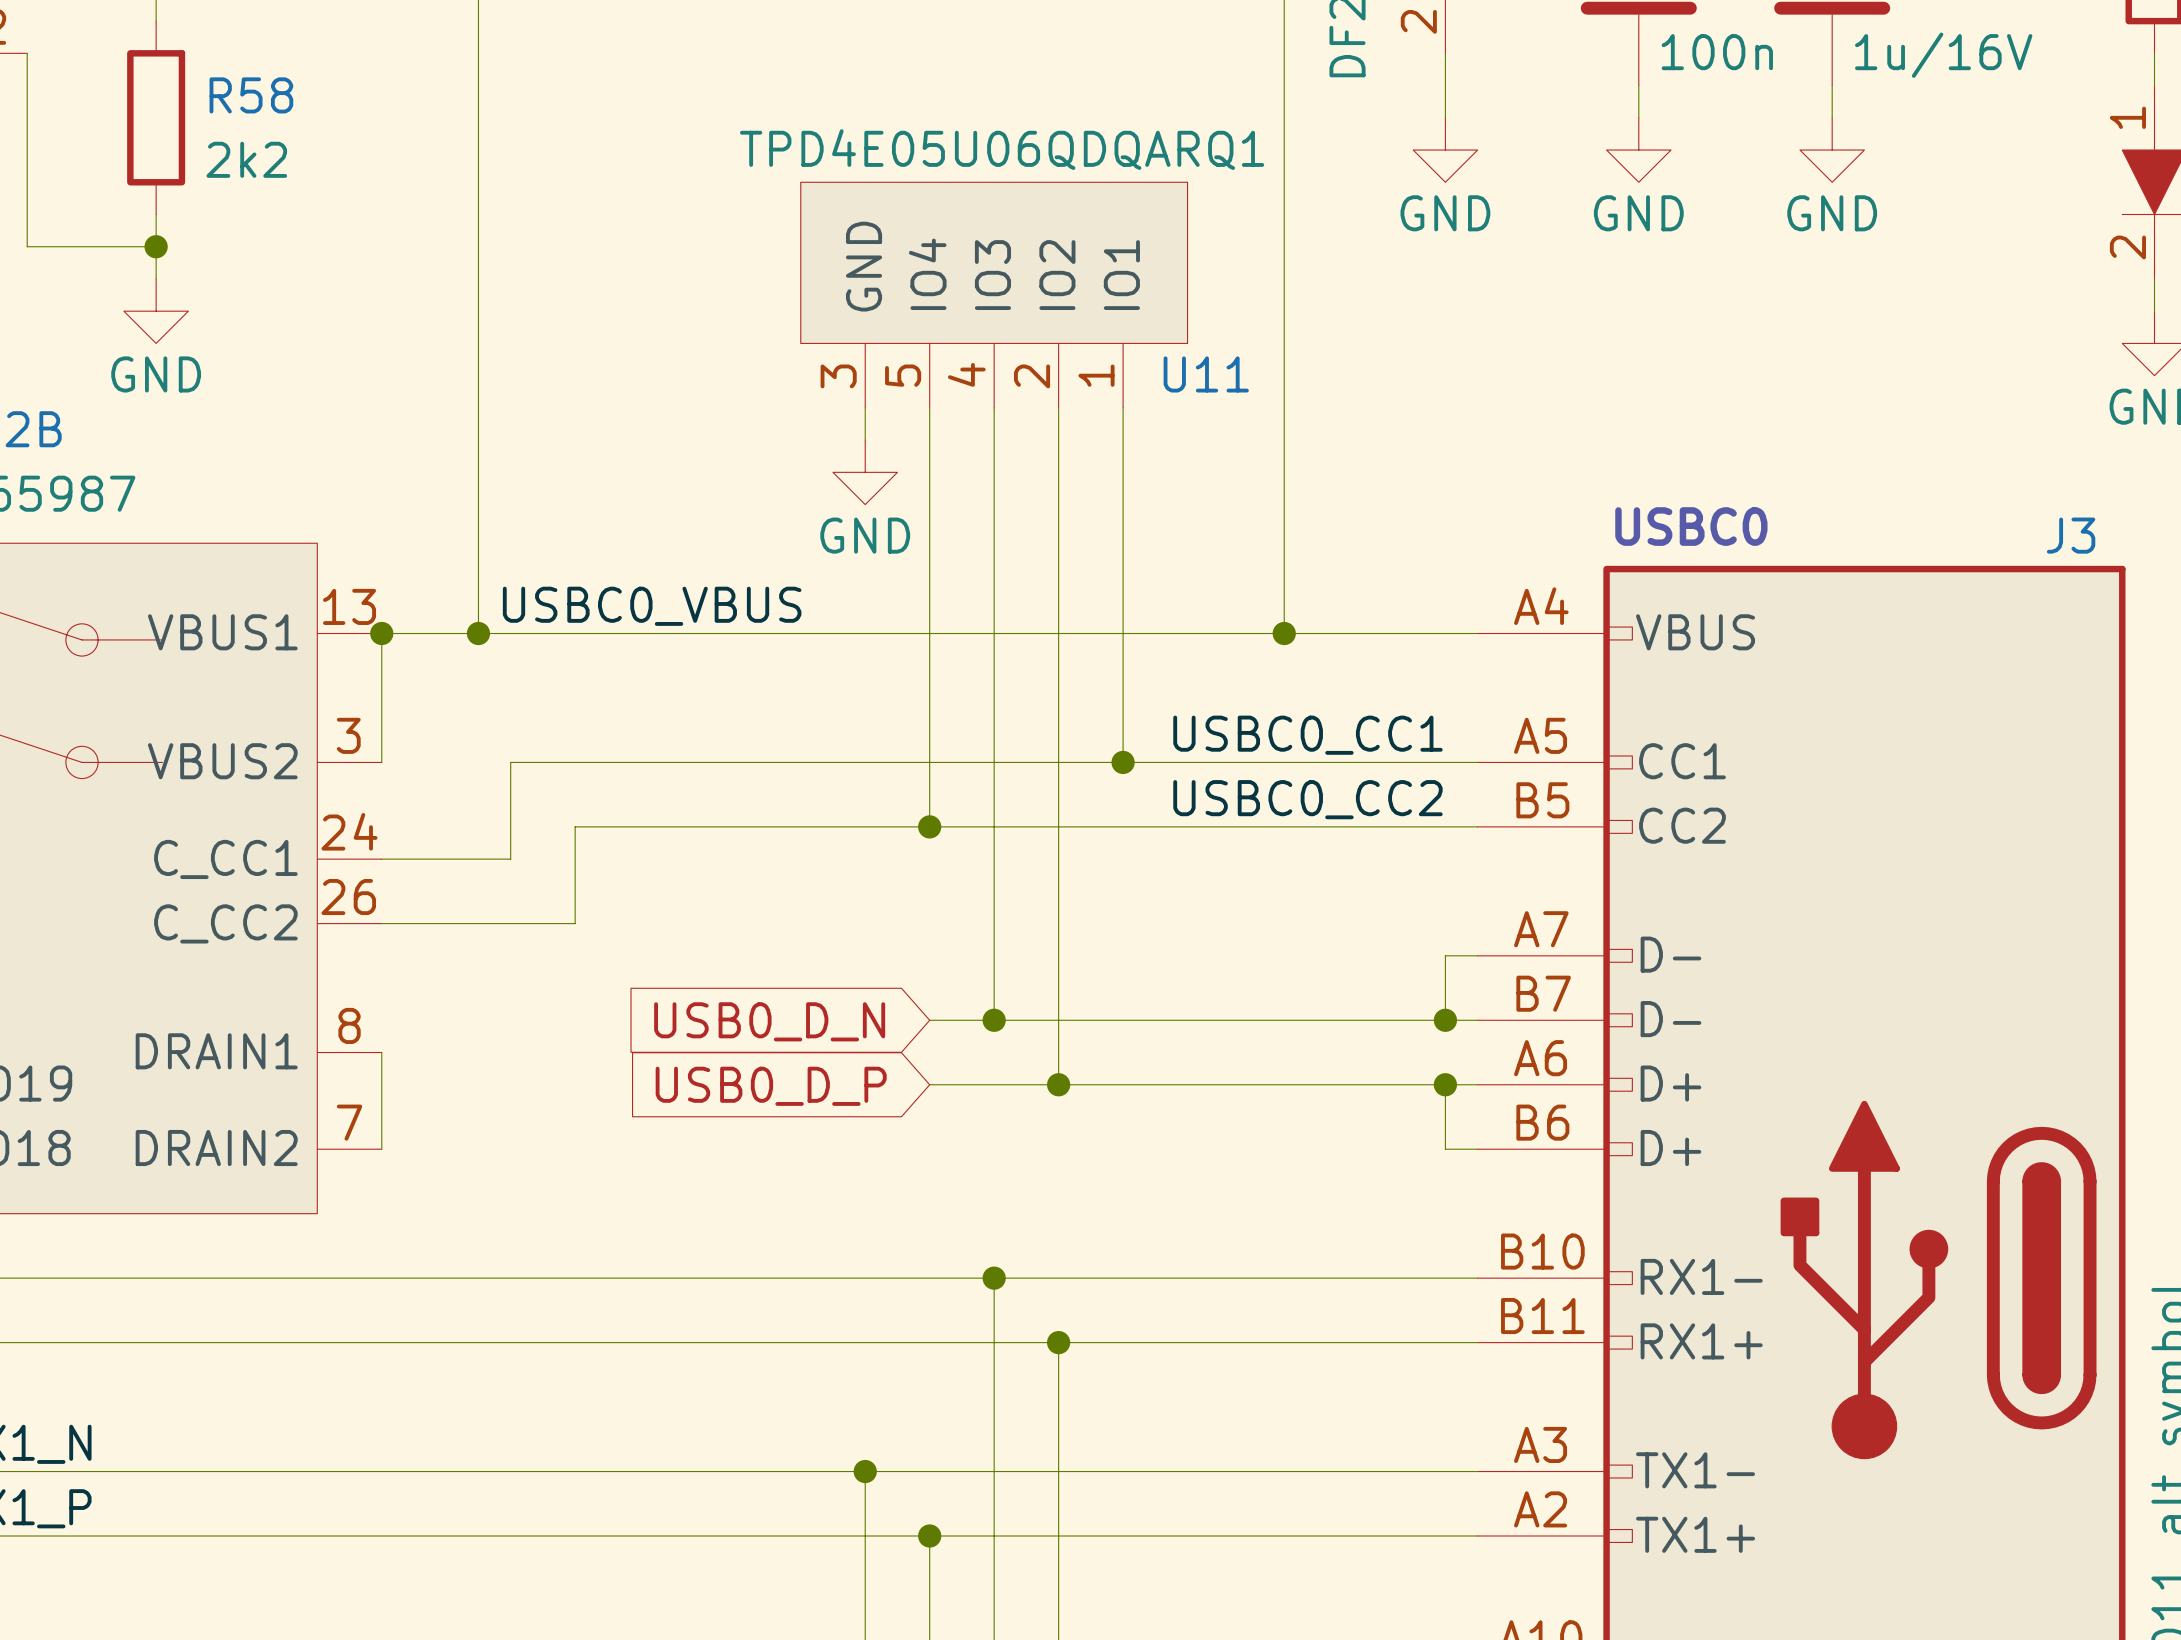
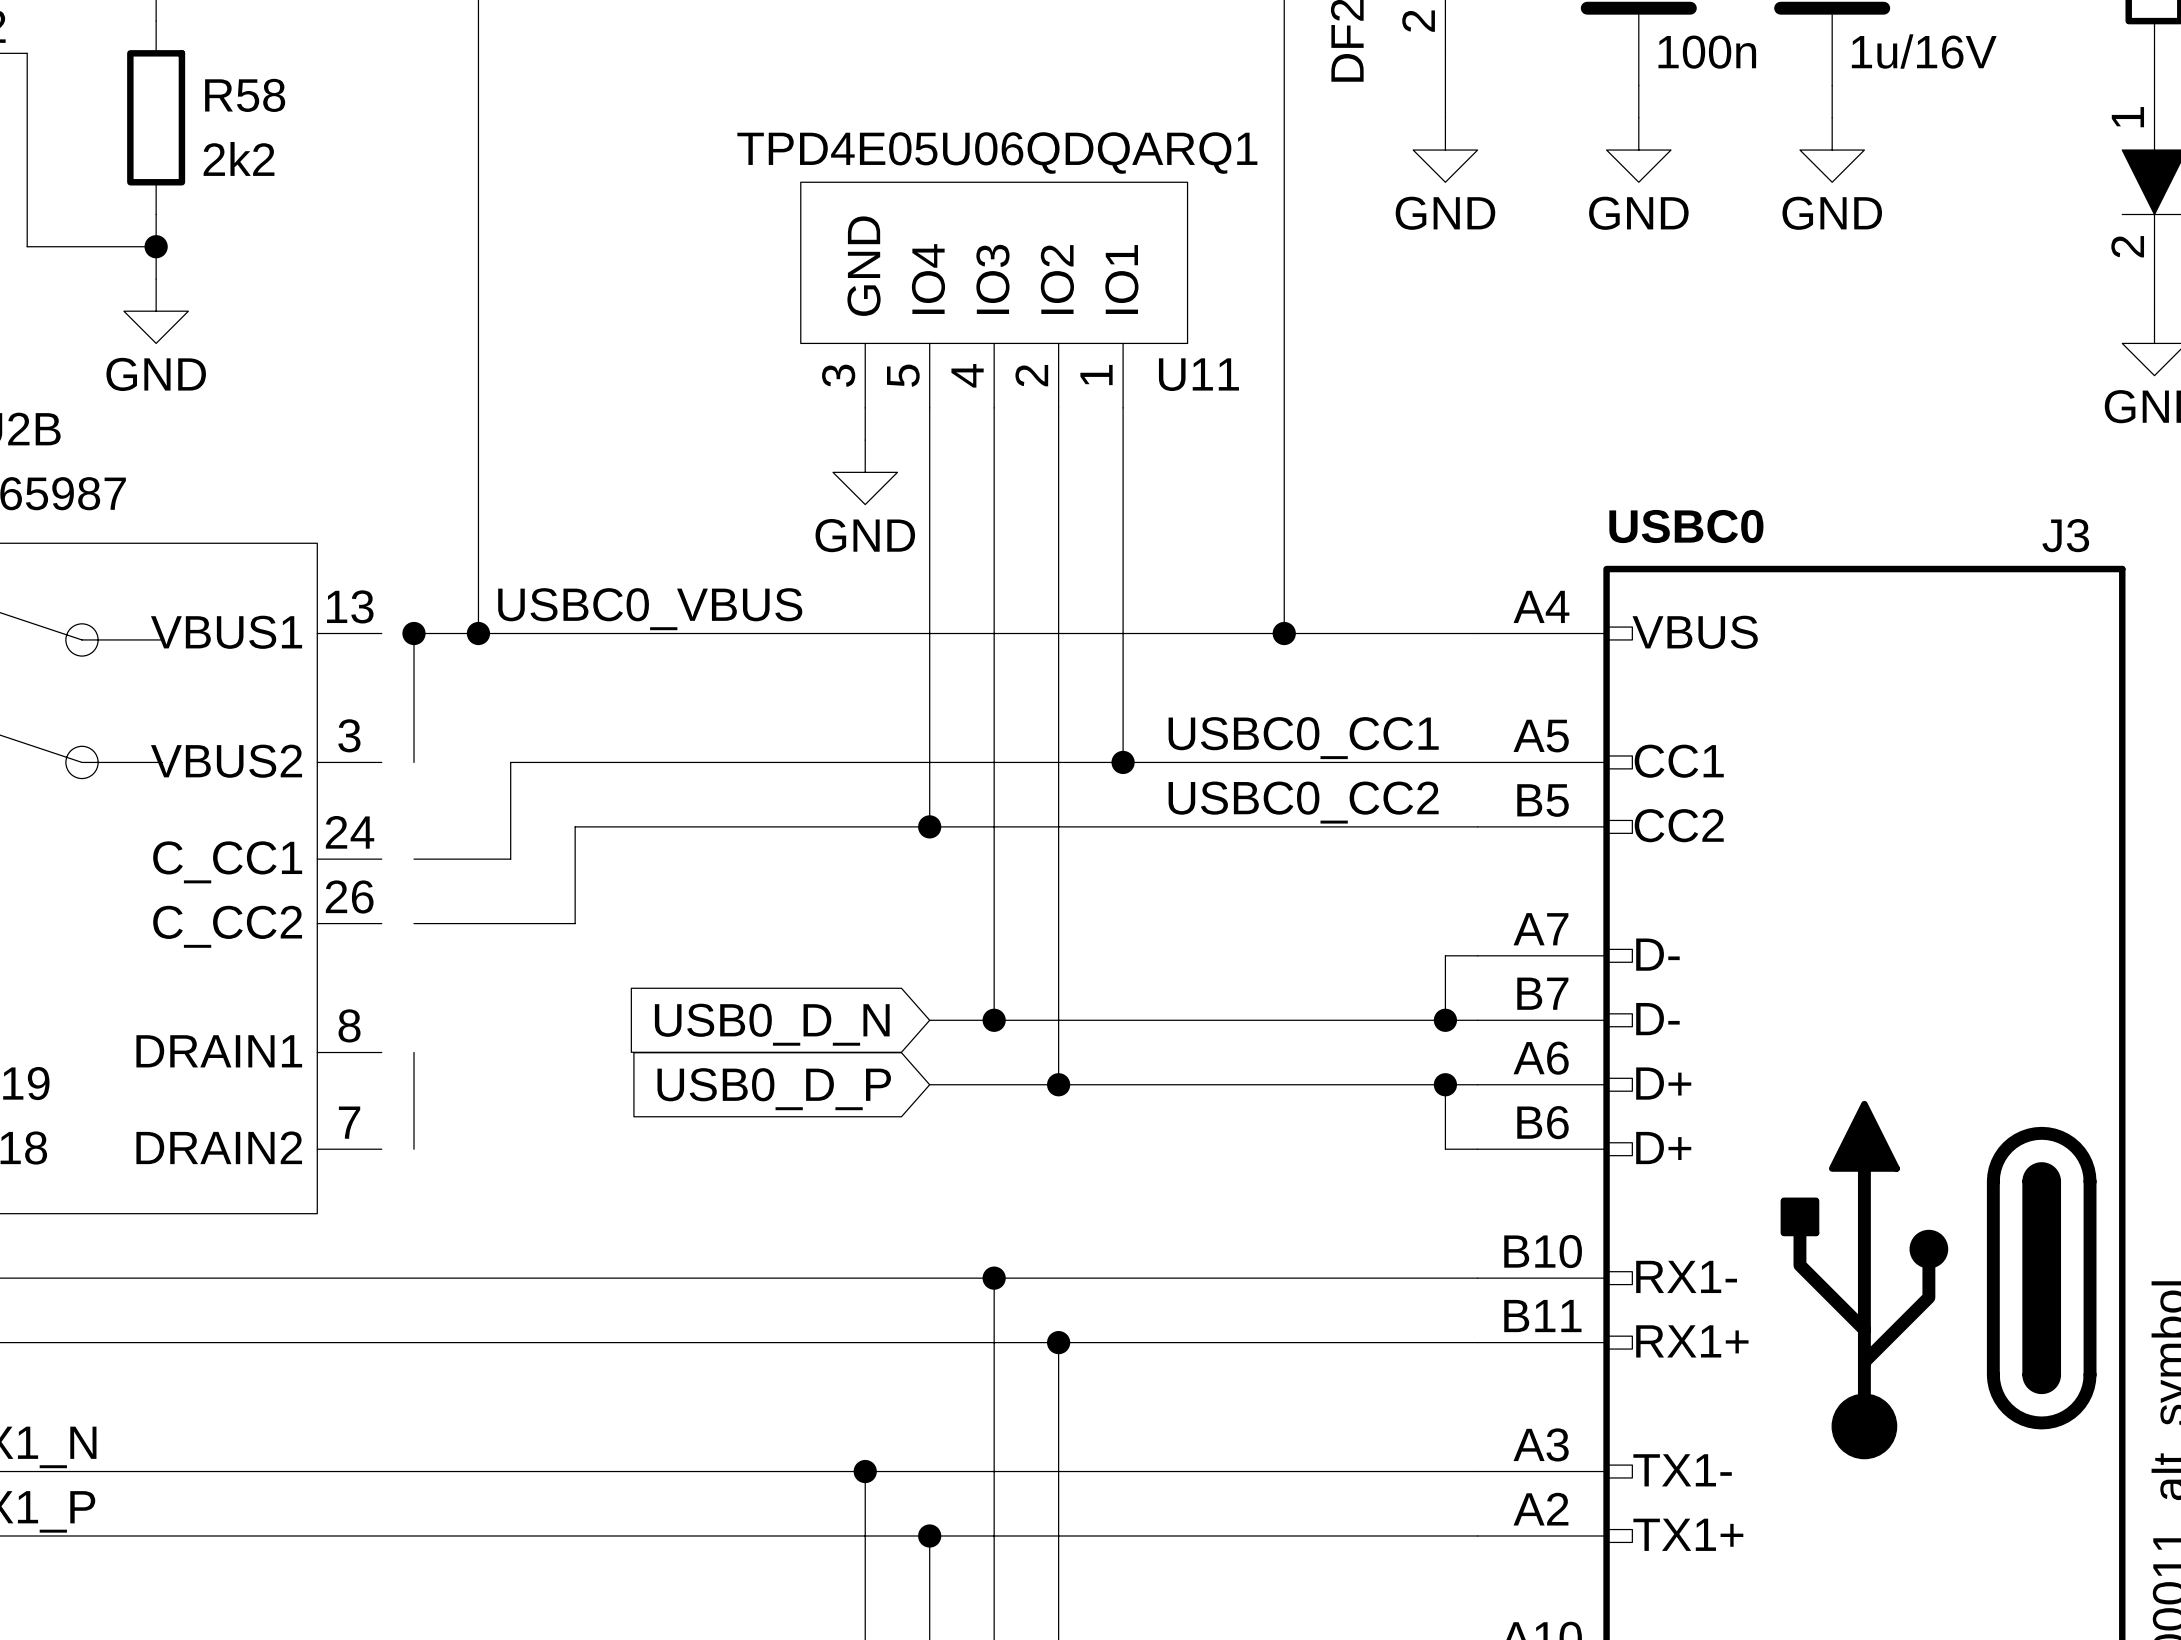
junction position: (381, 633) -> (413, 633)
wire: (413, 633) (381, 633) (381, 762) -> (413, 633) (413, 762)
wire: (381, 859) (413, 859) -> none
wire: (381, 923) (413, 923) -> none
wire: (381, 1052) (381, 1149) -> (413, 1052) (413, 1149)

